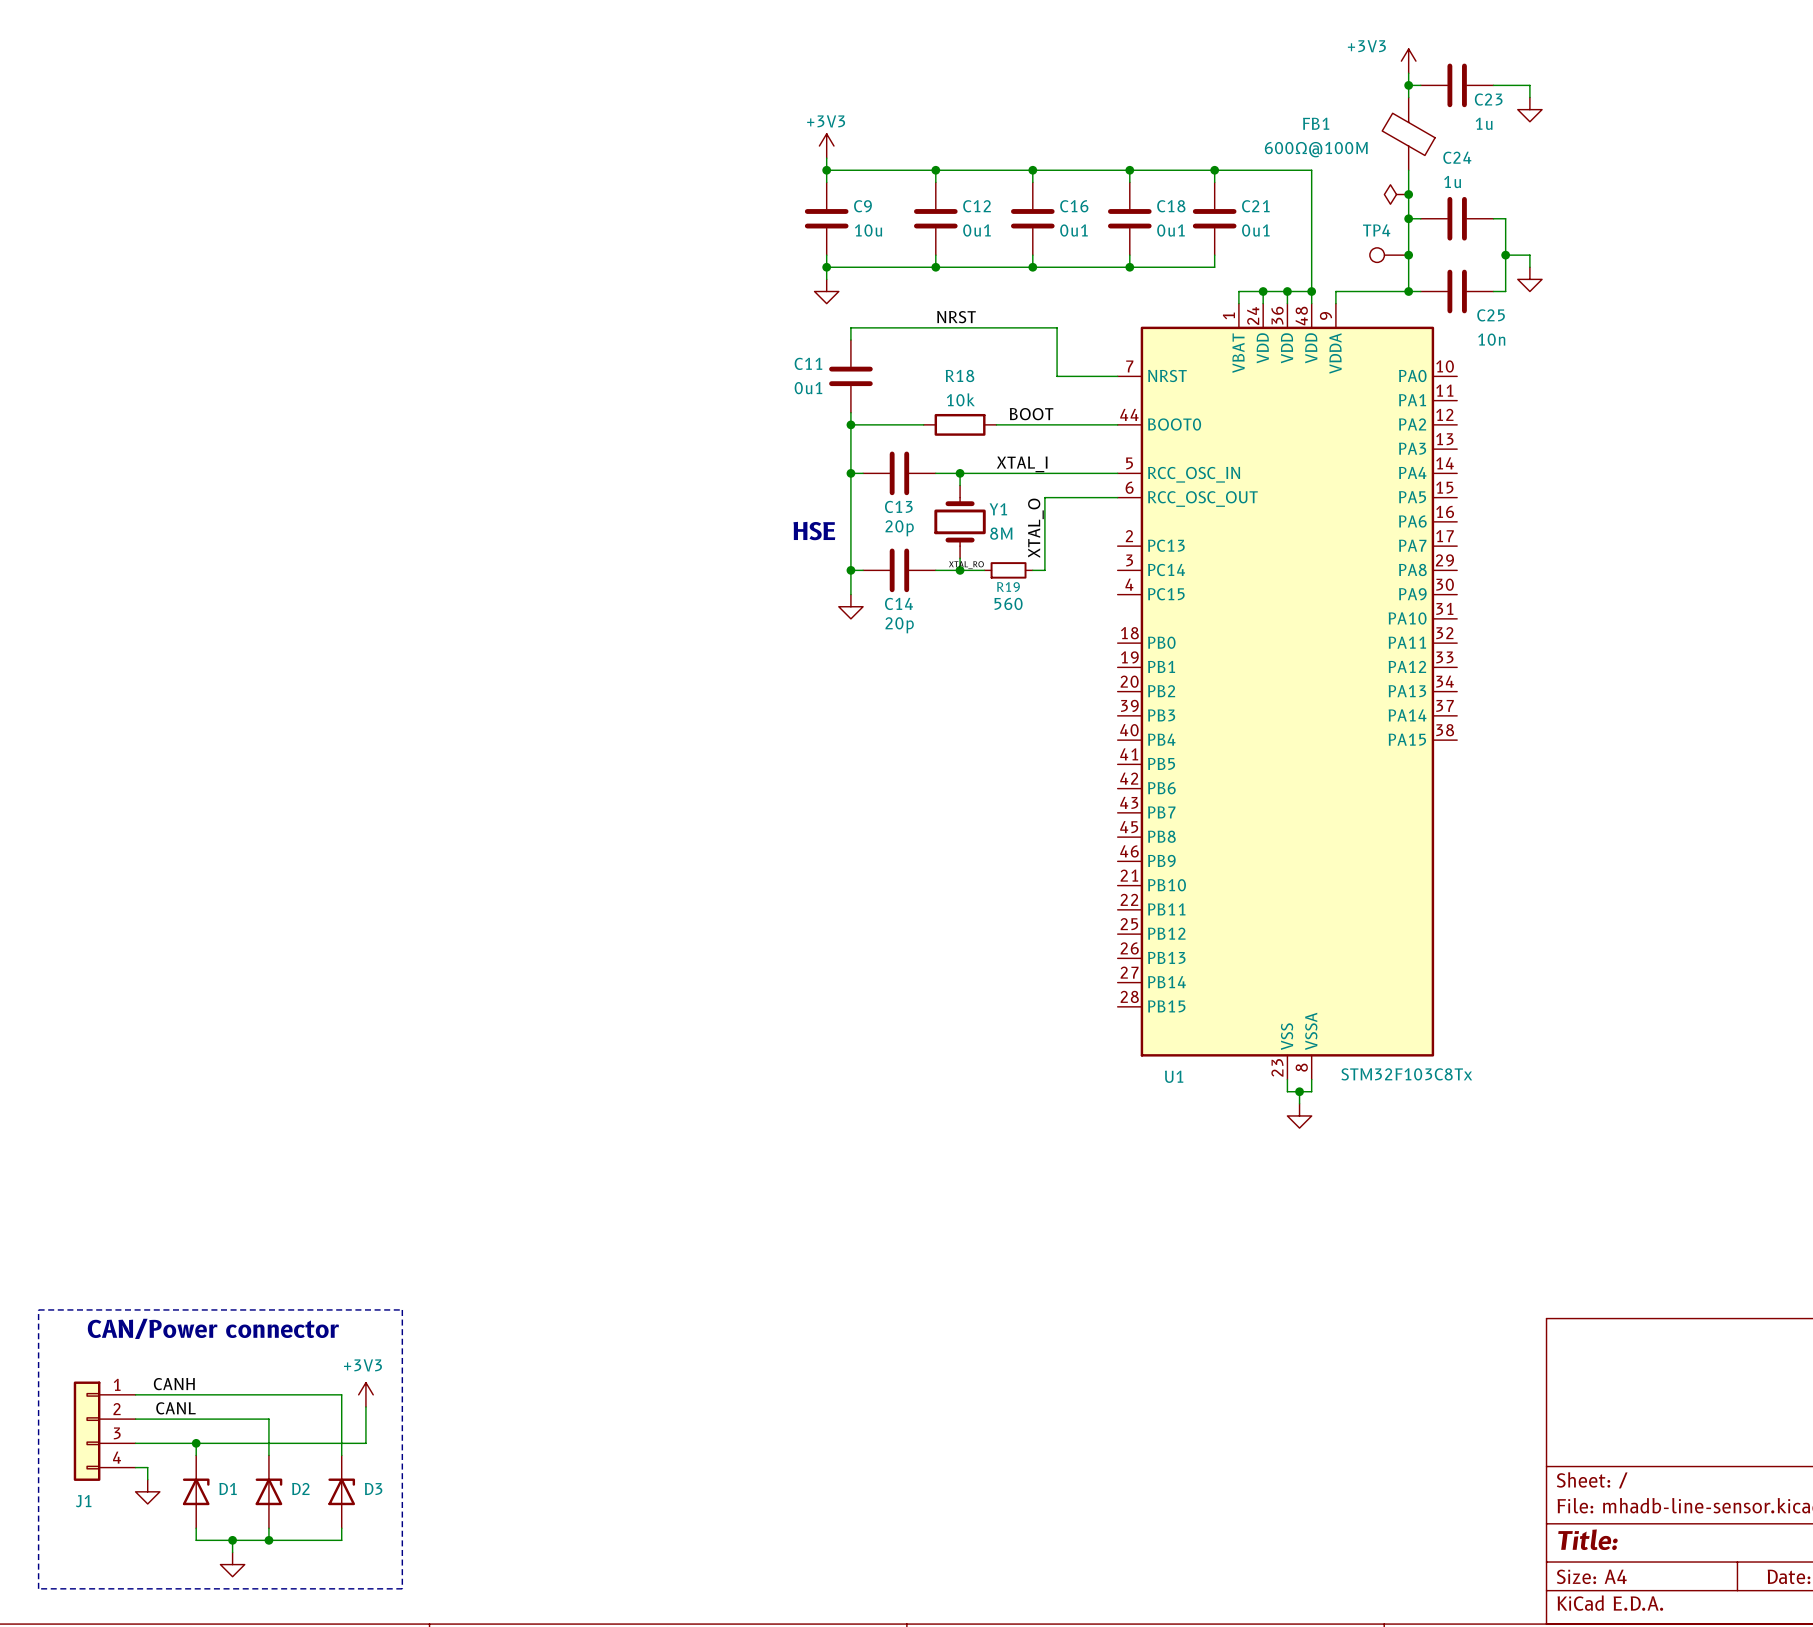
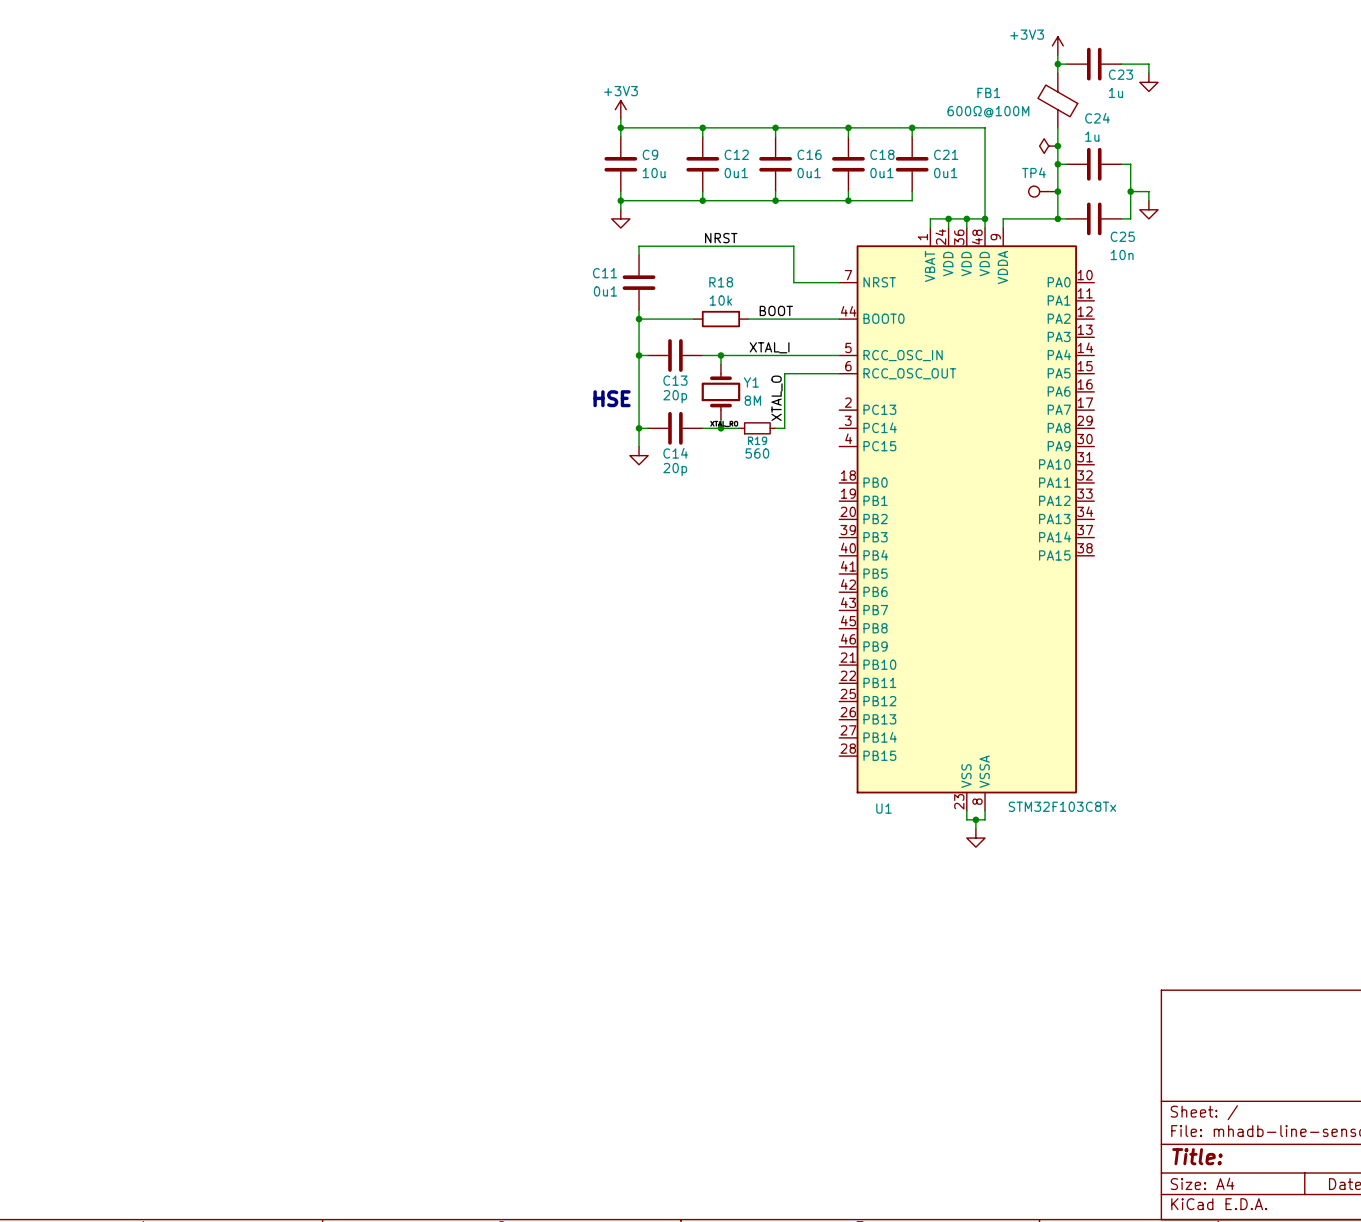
line: (38, 1309) (402, 1309) (402, 1588) (38, 1588) (38, 1309) -> none
text: CAN/Power connector (213, 1328) -> none
label: CANH (174, 1384) -> none
wire: (135, 1394) (341, 1394) (341, 1455) -> none
power symbol: +3V3 (365, 1394) -> none
wire: (365, 1406) (365, 1443) (135, 1443) -> none
label: CANL (175, 1408) -> none
wire: (135, 1419) (268, 1419) (268, 1455) -> none
J1: (104, 1431) -> none
wire: (196, 1443) (196, 1455) -> none
junction: (196, 1443) -> none
wire: (135, 1467) (147, 1467) (147, 1479) -> none
power symbol: (147, 1491) -> none
D1: (196, 1491) -> none
D2: (268, 1491) -> none
D3: (341, 1491) -> none
wire: (196, 1528) (196, 1540) (341, 1540) (341, 1528) -> none
wire: (268, 1528) (268, 1540) -> none
wire: (232, 1540) (232, 1552) -> none
junction: (232, 1540) -> none
junction: (268, 1540) -> none
power symbol: (232, 1564) -> none

